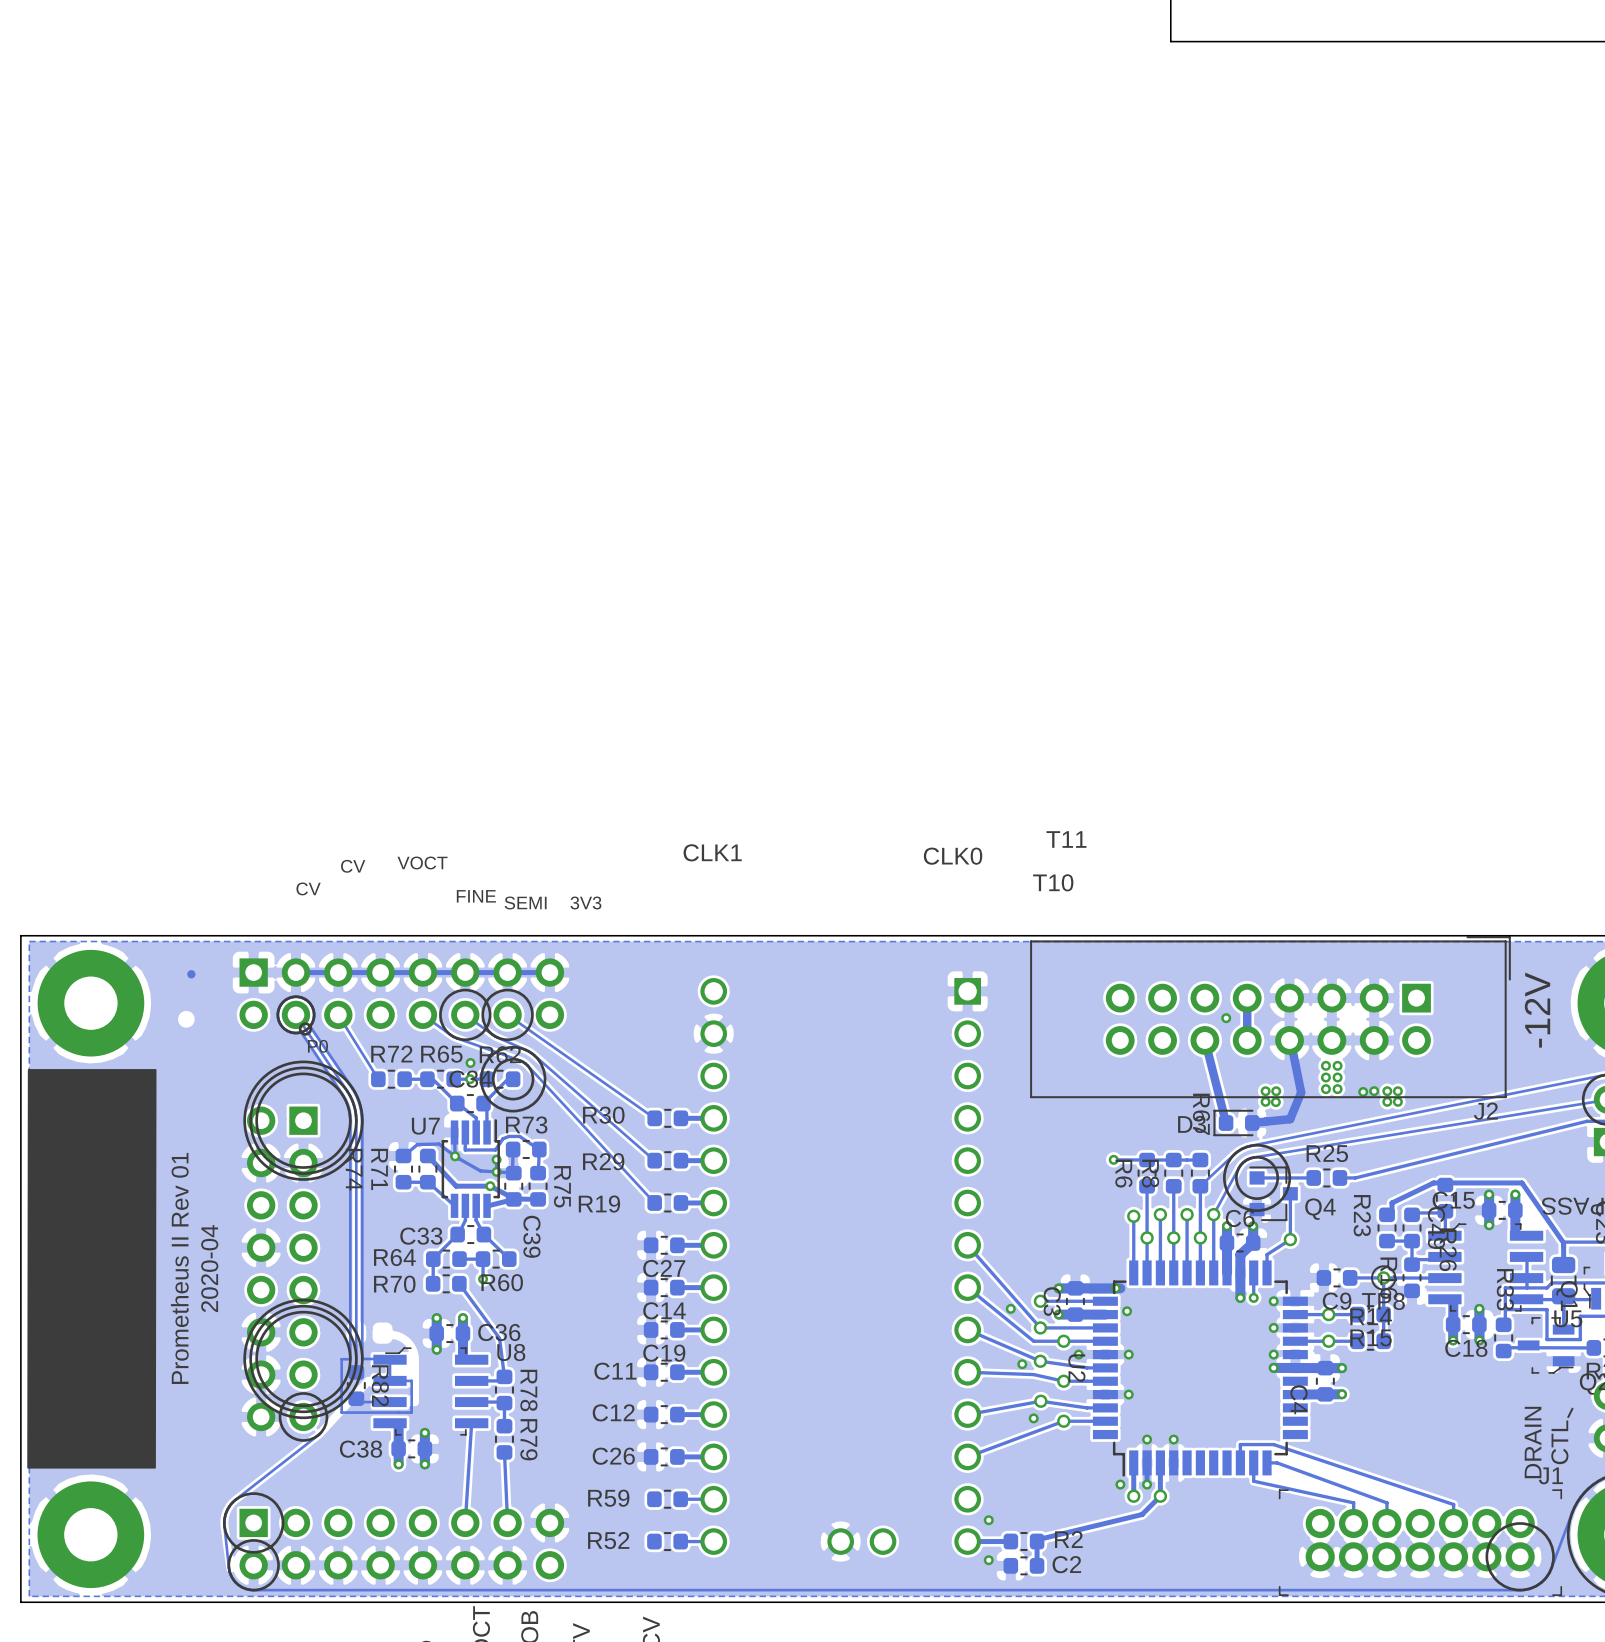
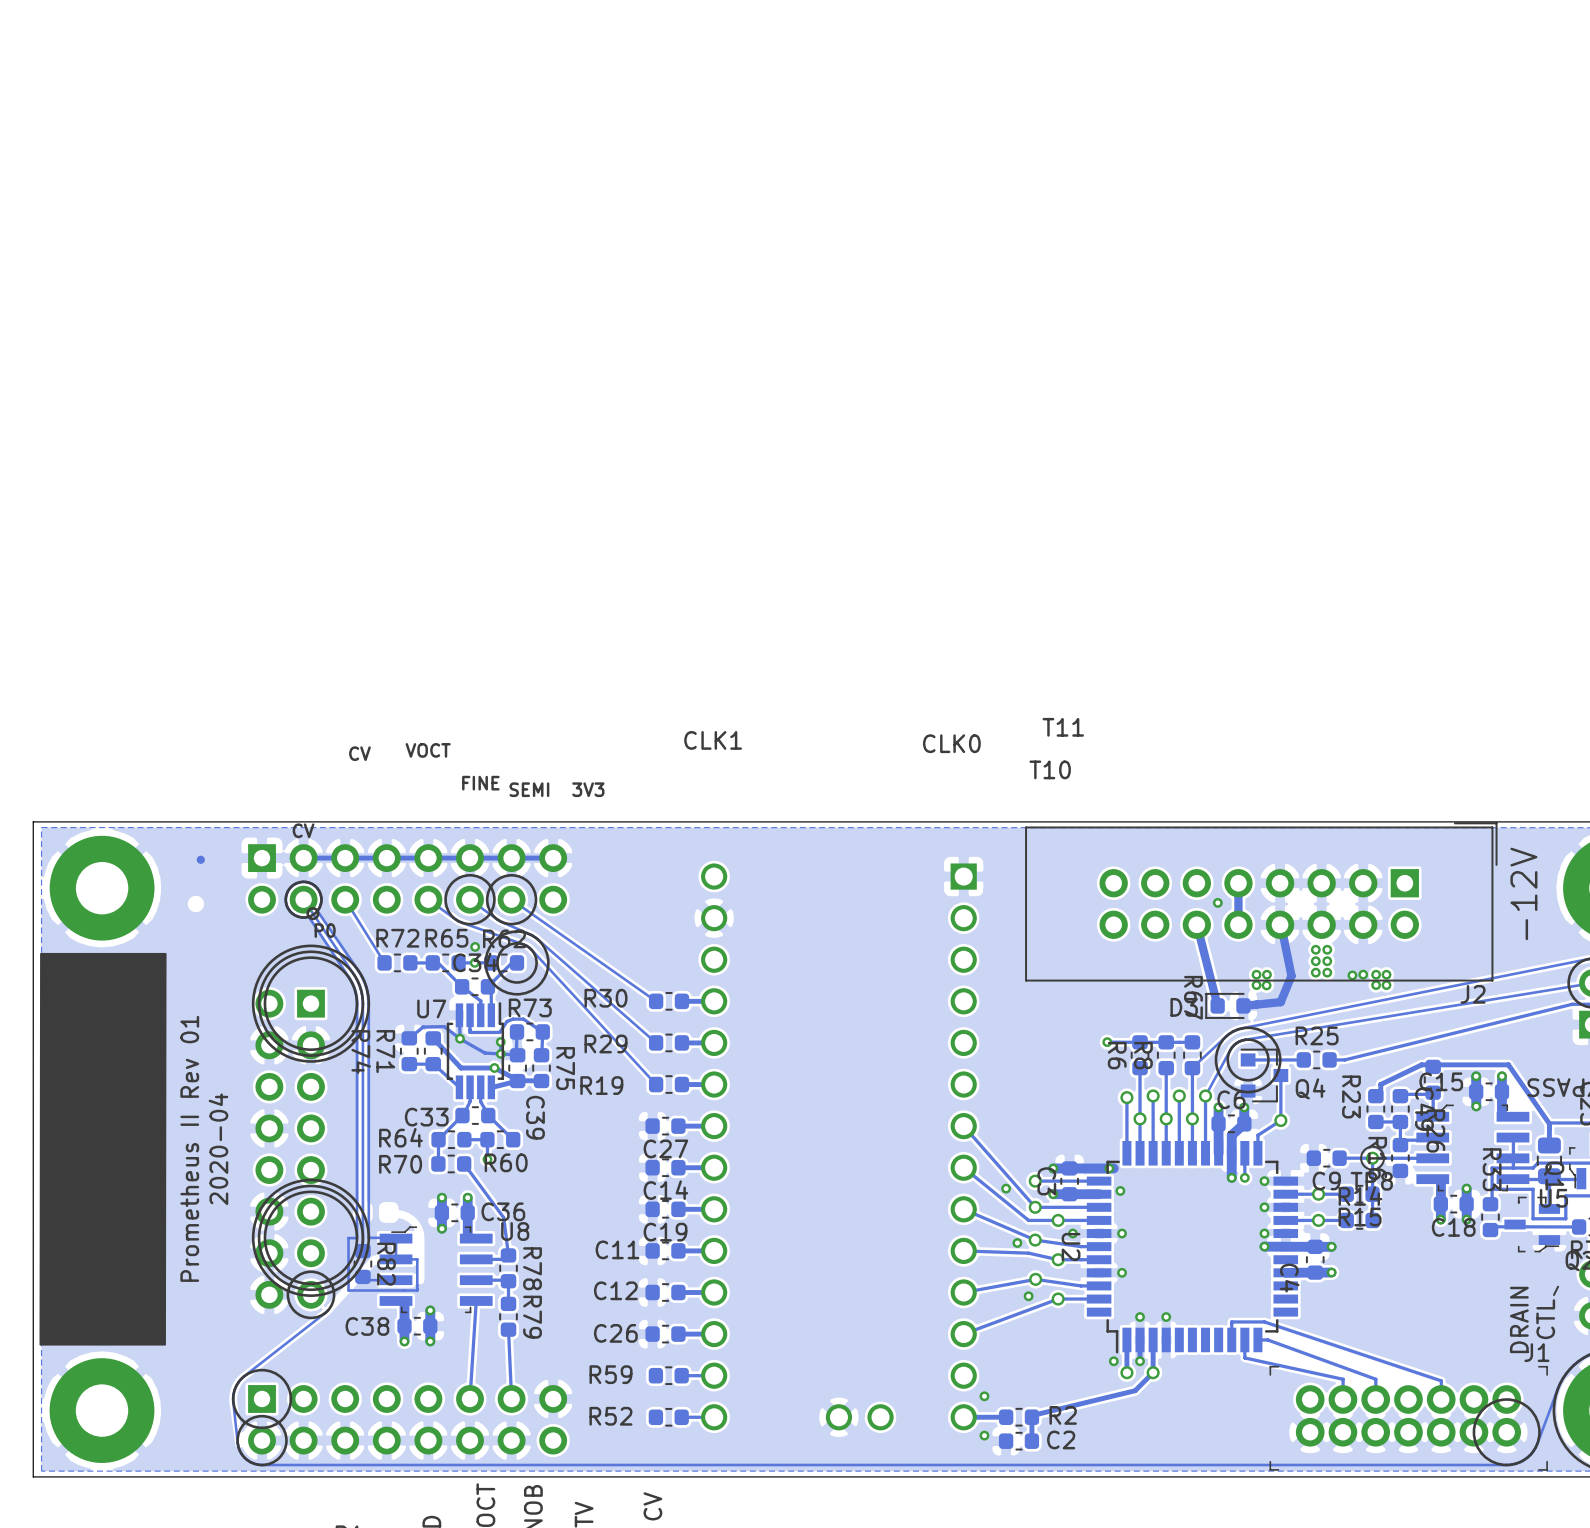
text position: CV (308, 888) -> CV (303, 830)

